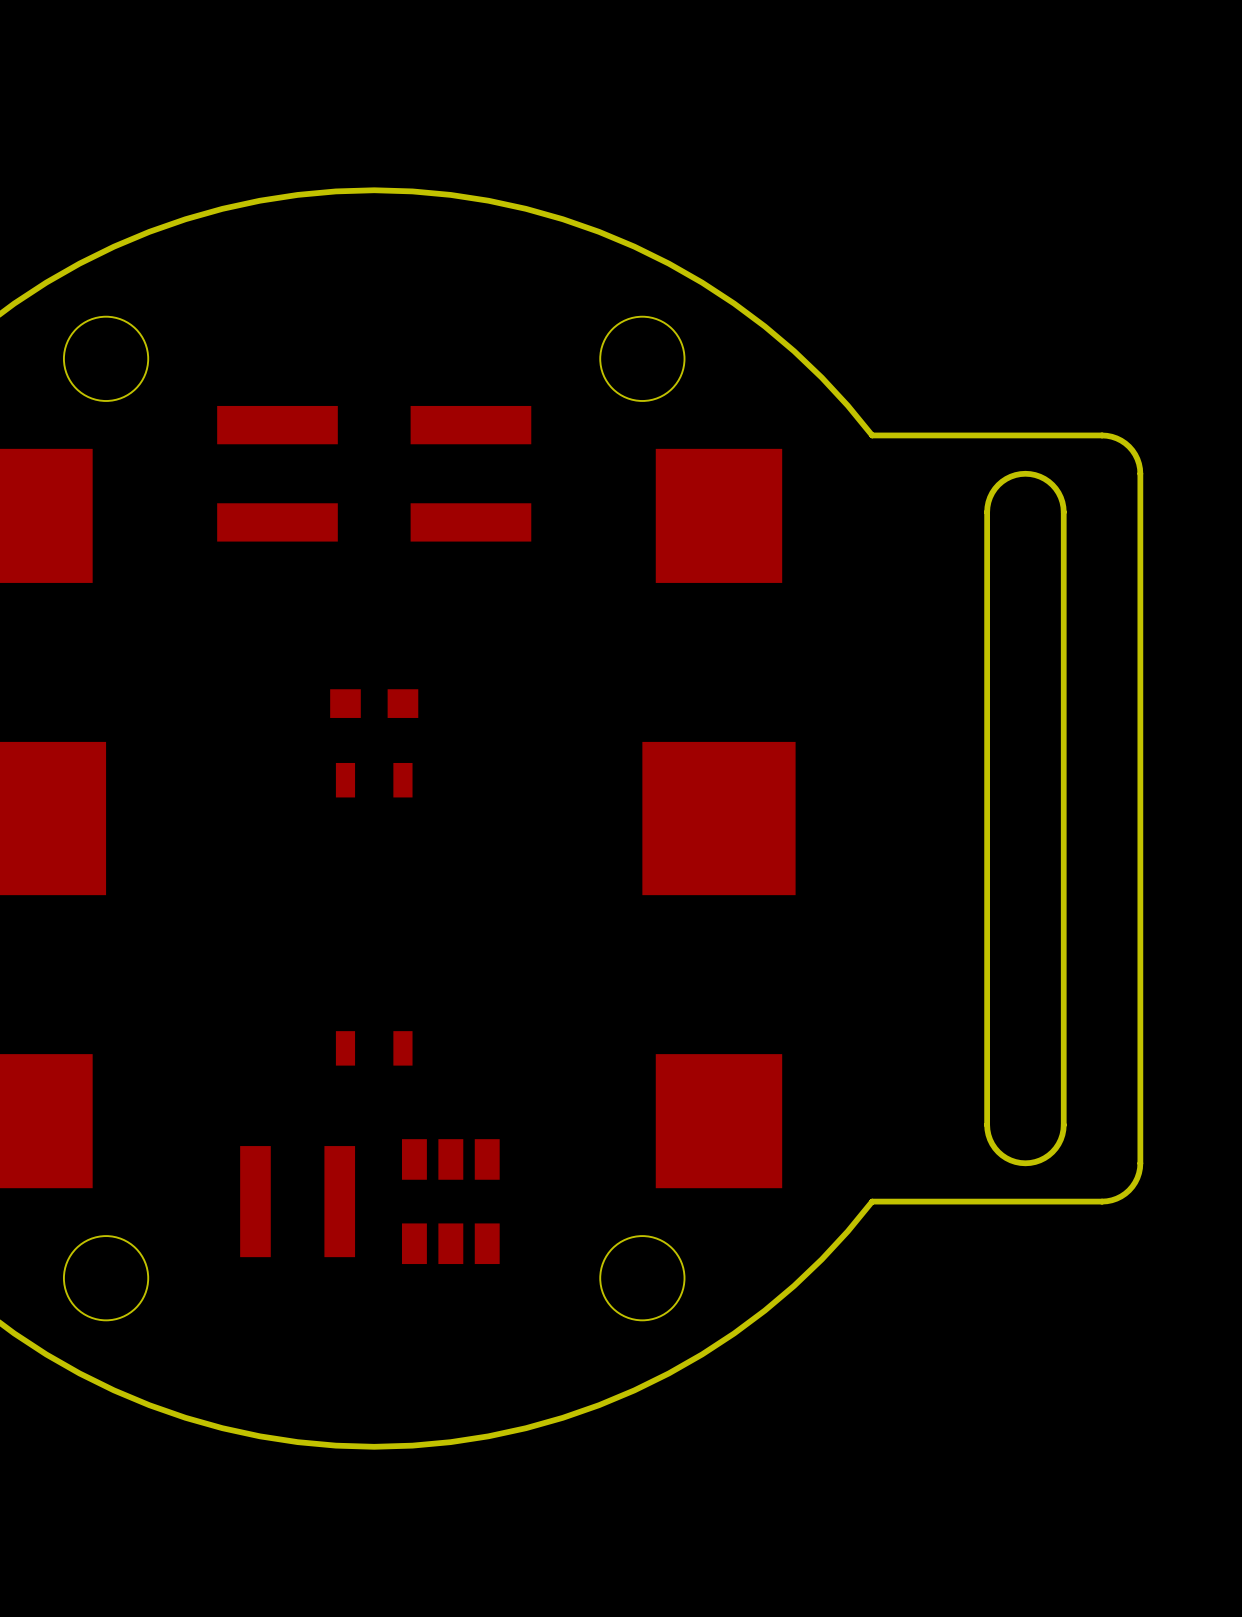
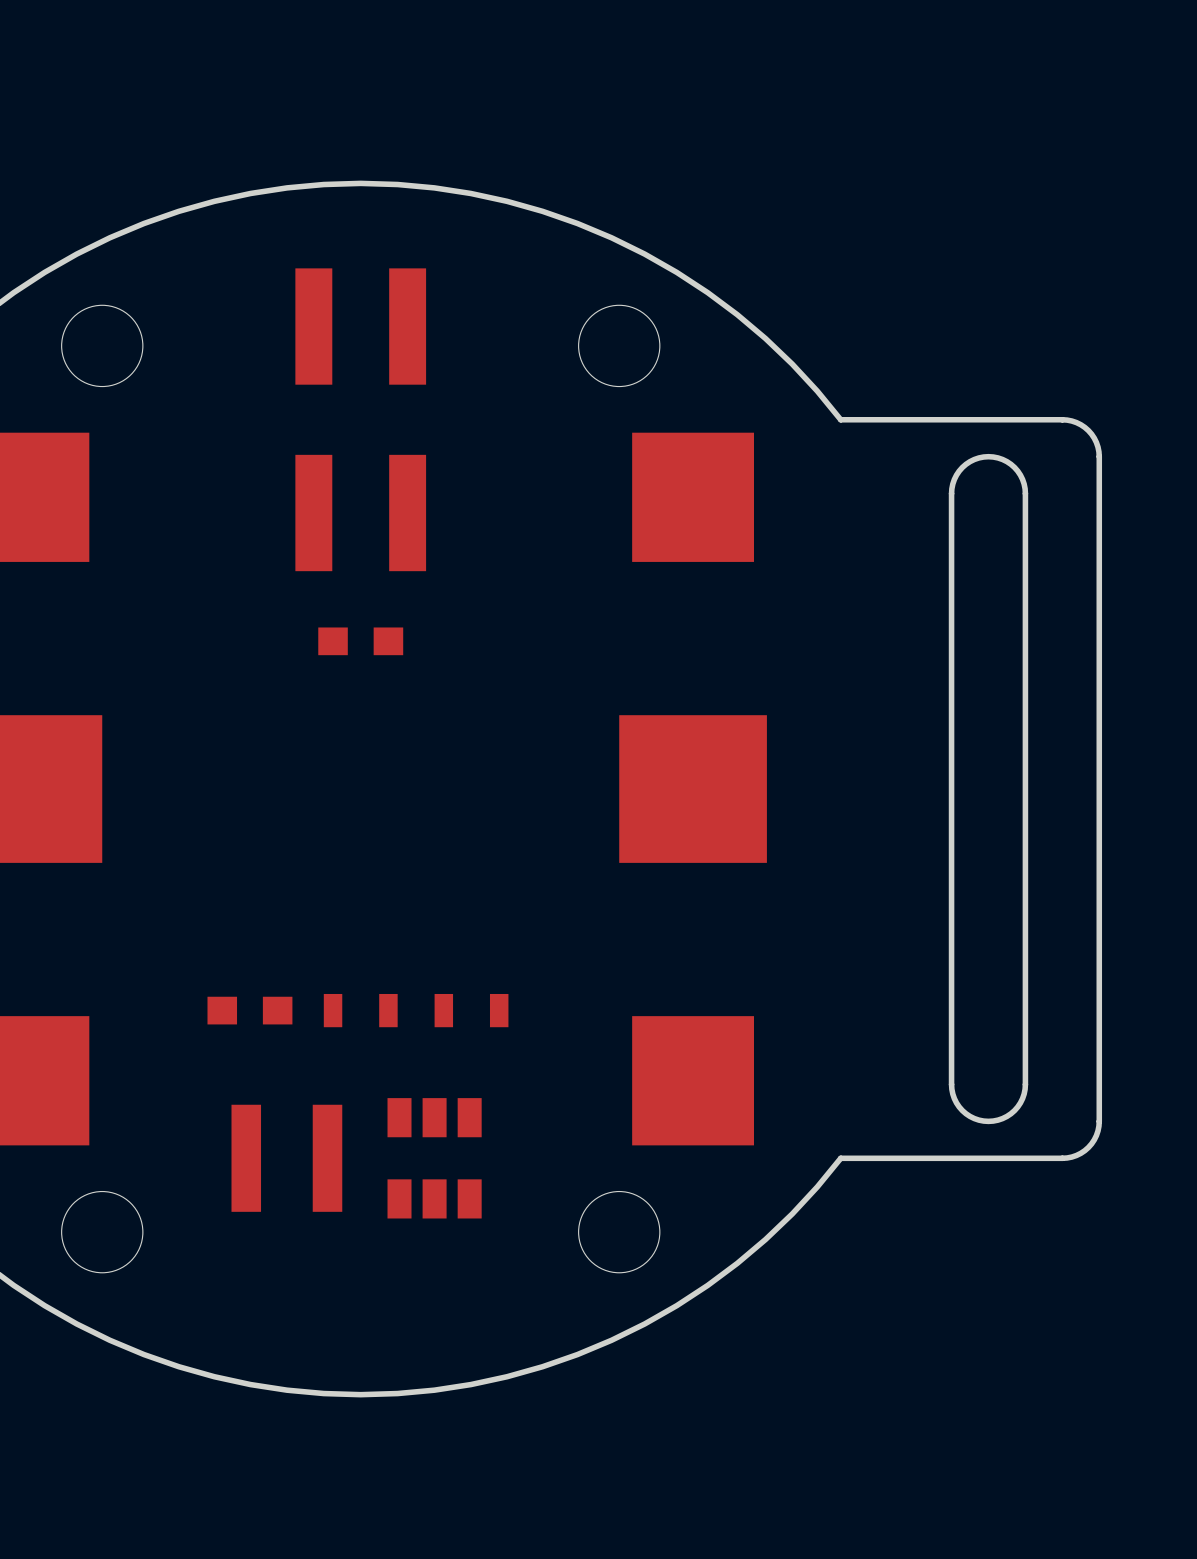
part rotation: 0° (374, 473) -> 90° clockwise (360, 419)
part position: (374, 703) -> (360, 641)
part position: (374, 780) -> (471, 1010)
part: none -> (249, 1010)

